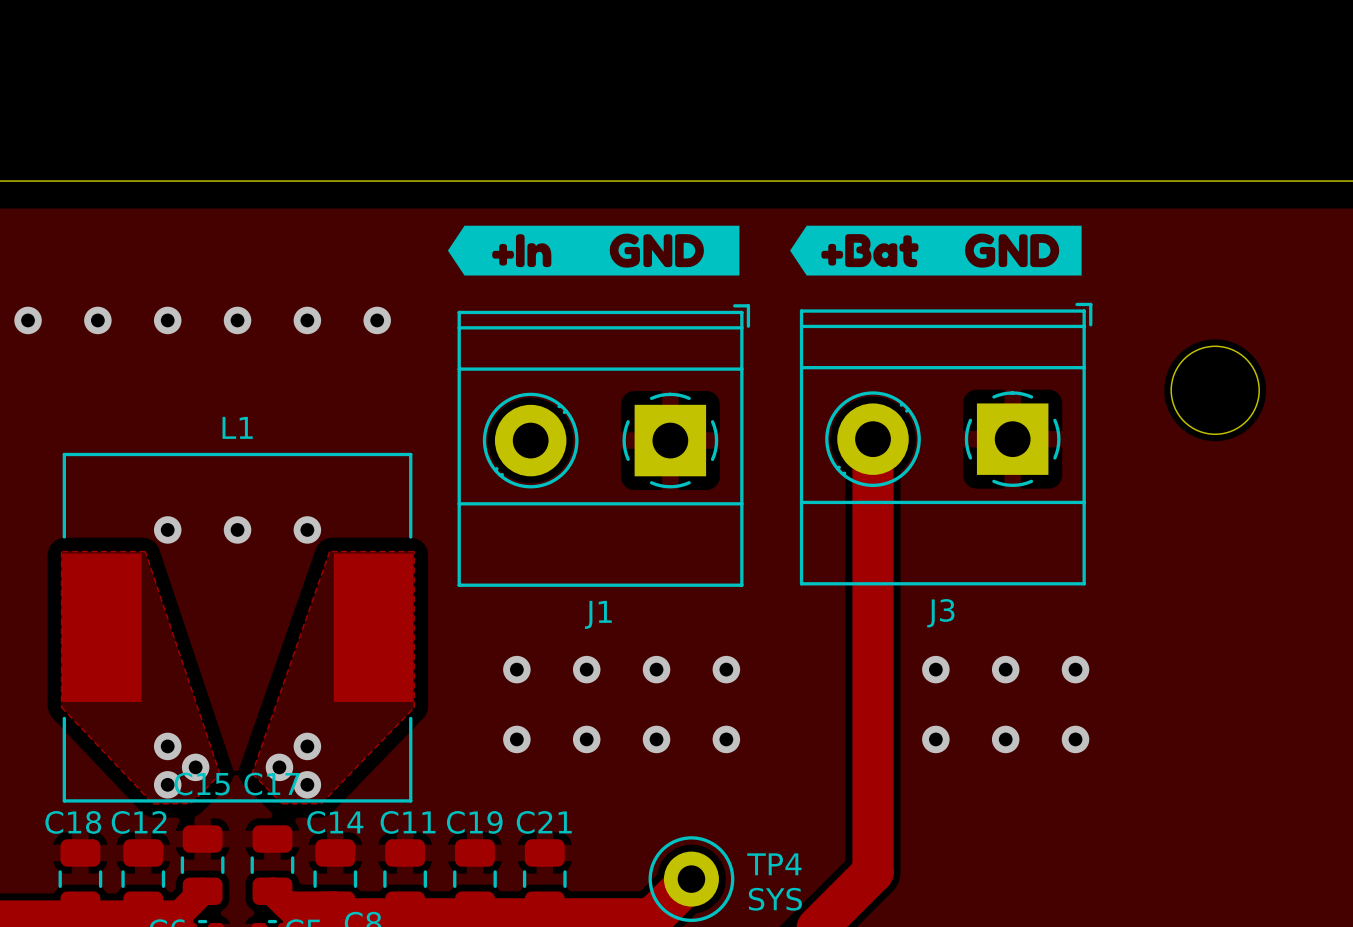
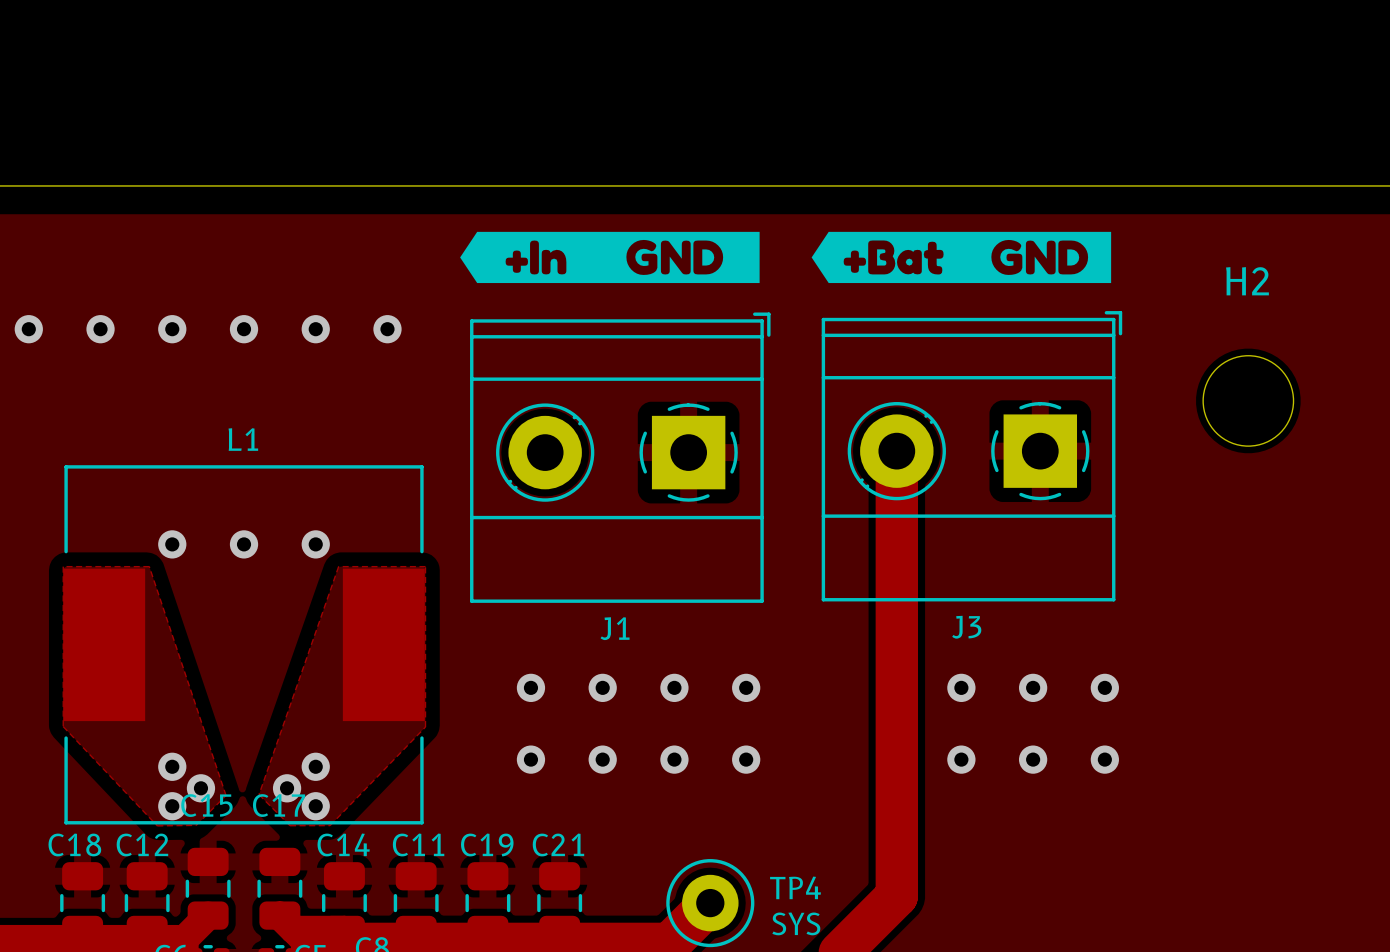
H2 name: none -> H2 (1247, 281)

